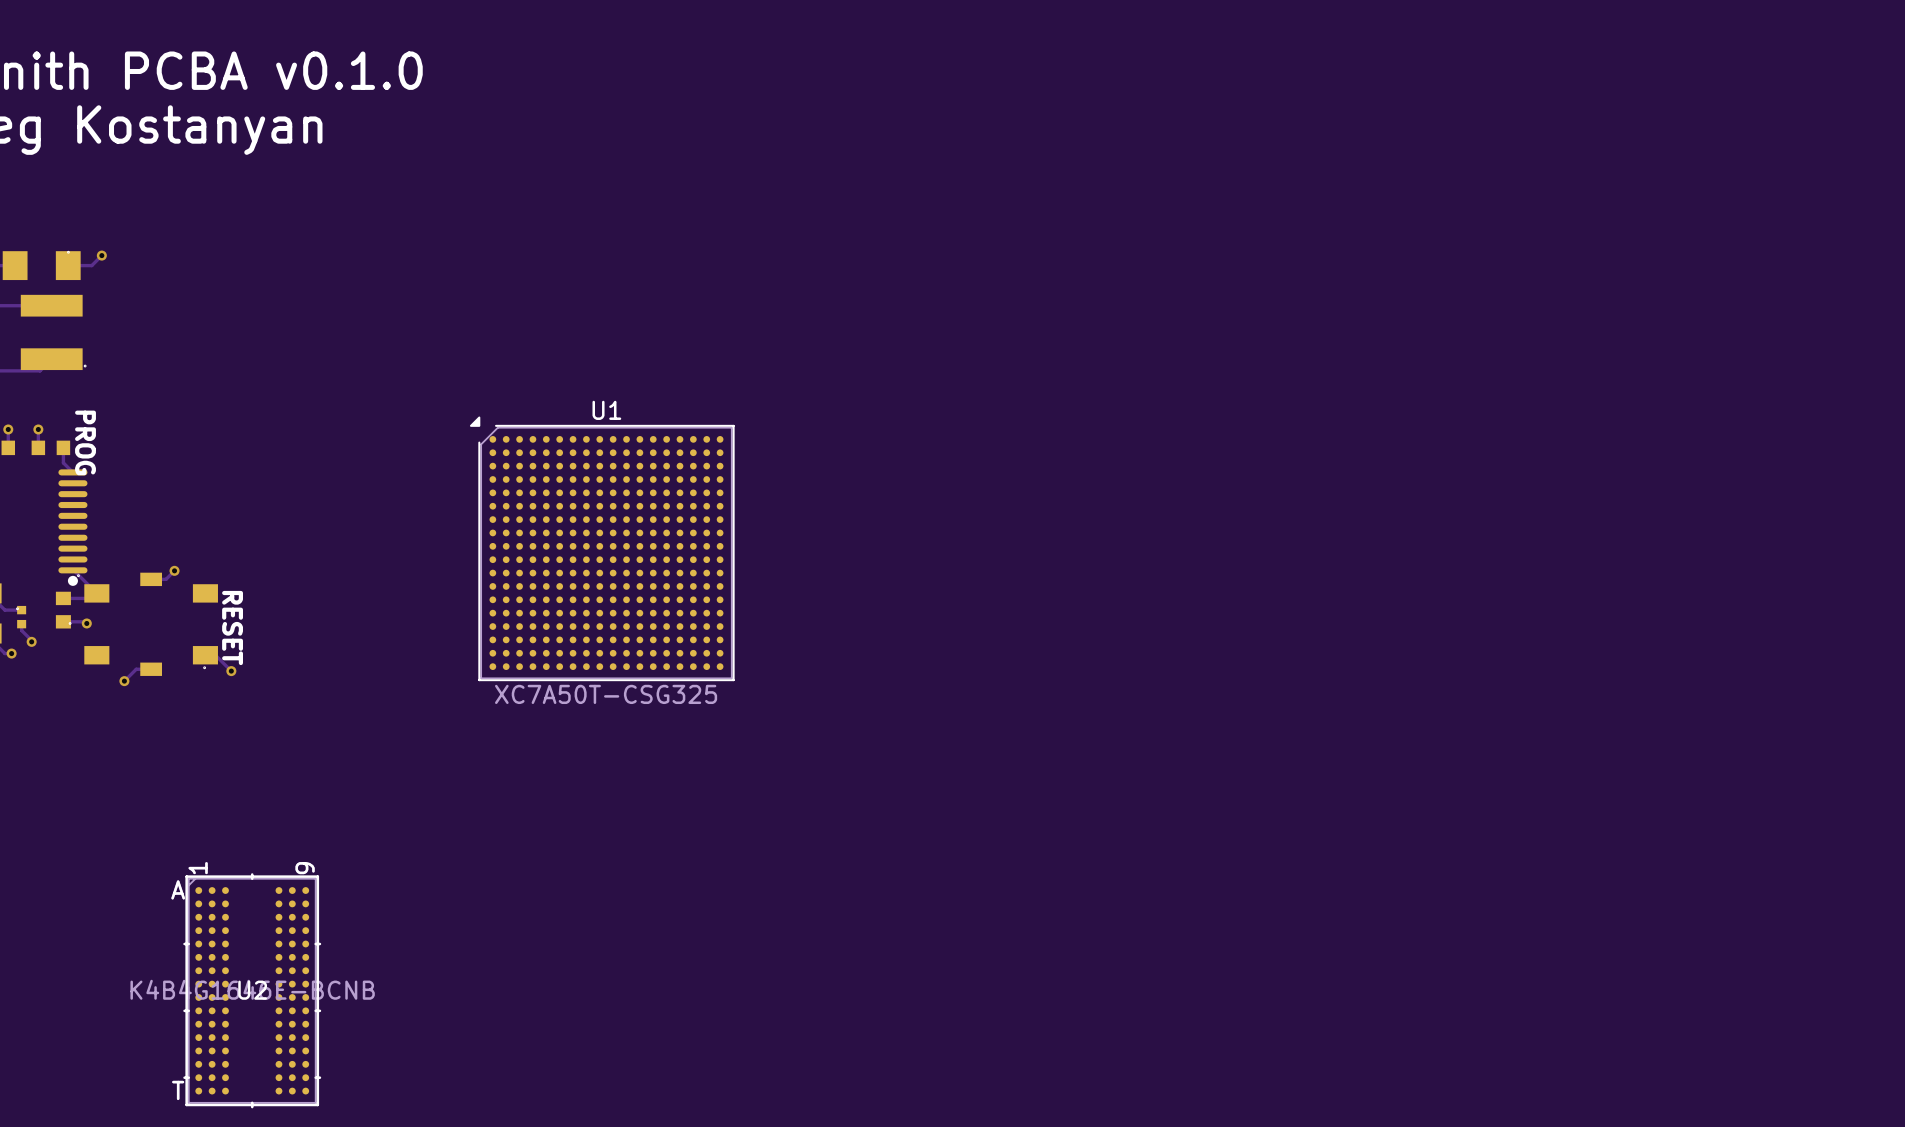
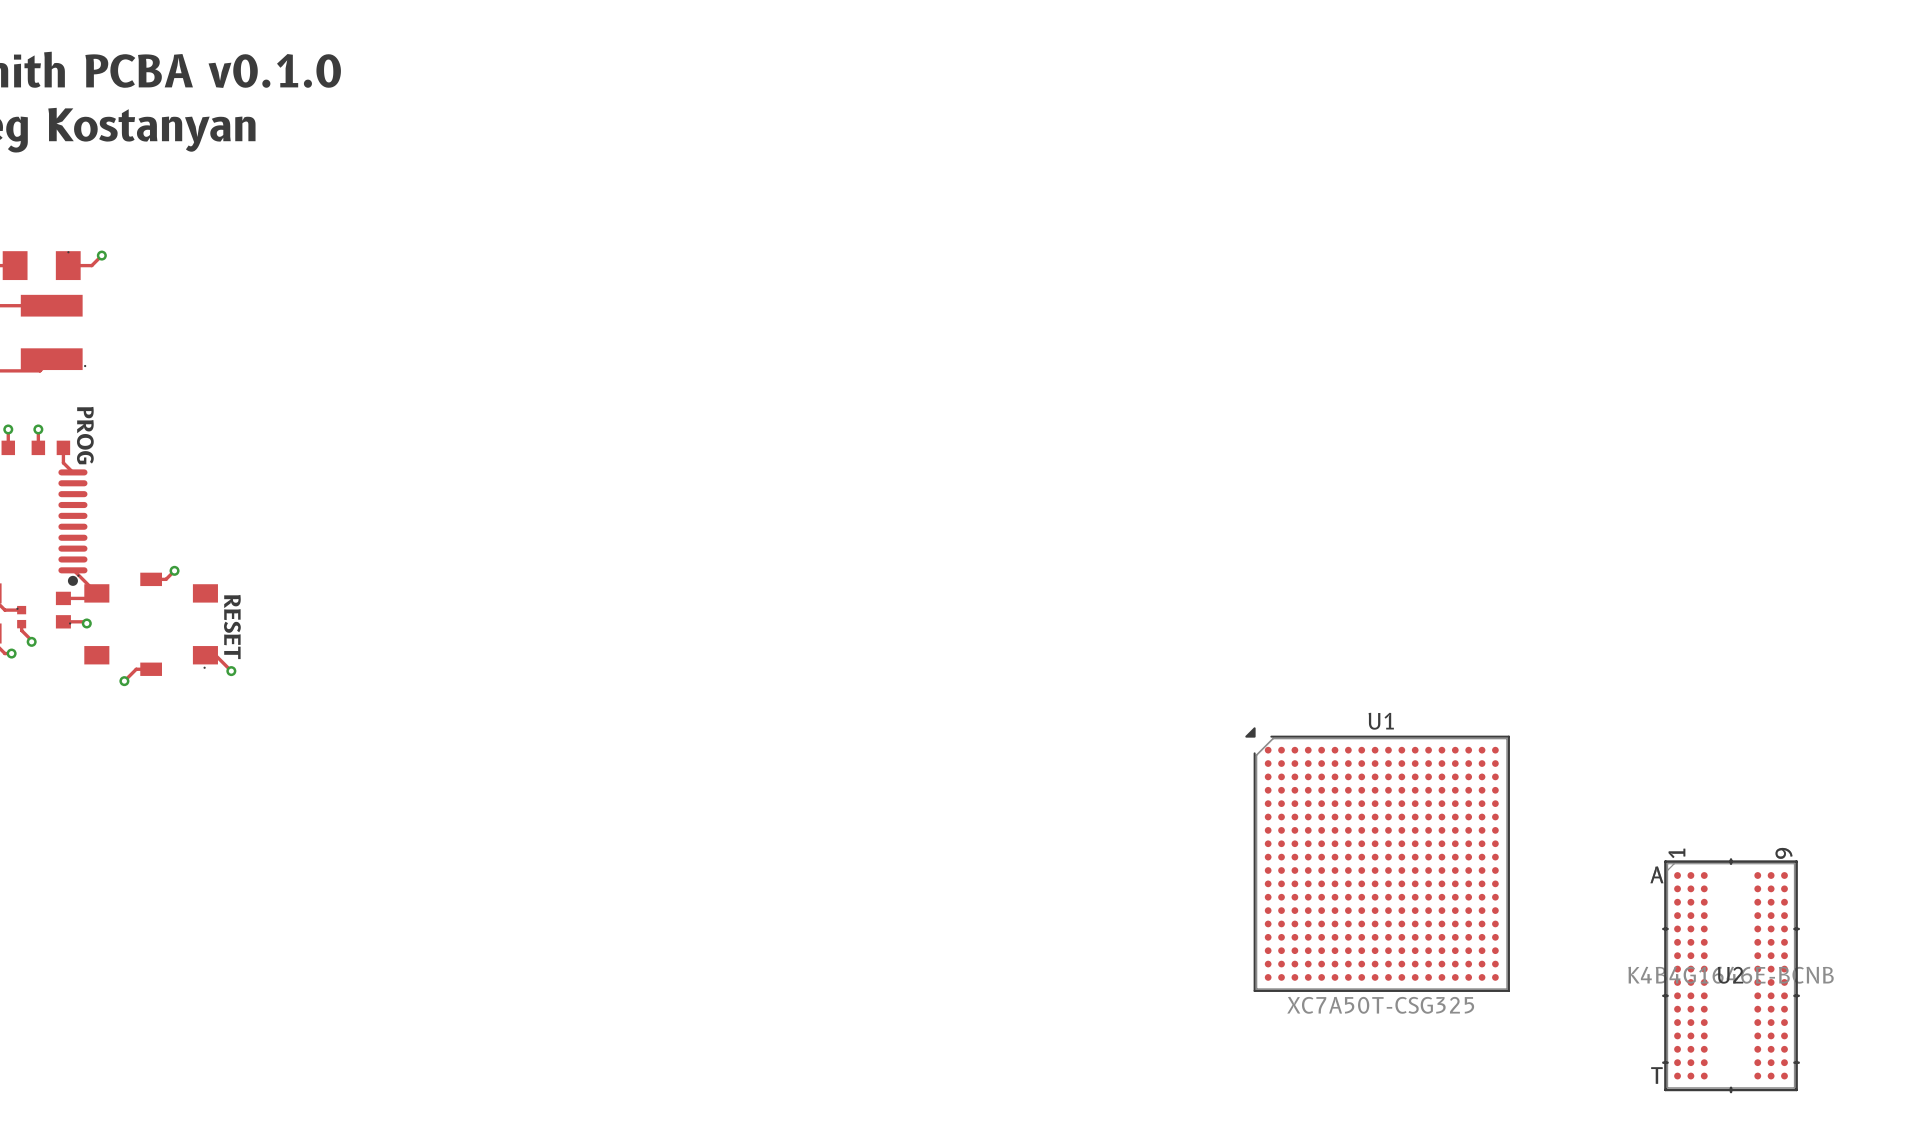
U1 position: (602, 548) -> (1377, 859)
U2 position: (252, 990) -> (1731, 975)

